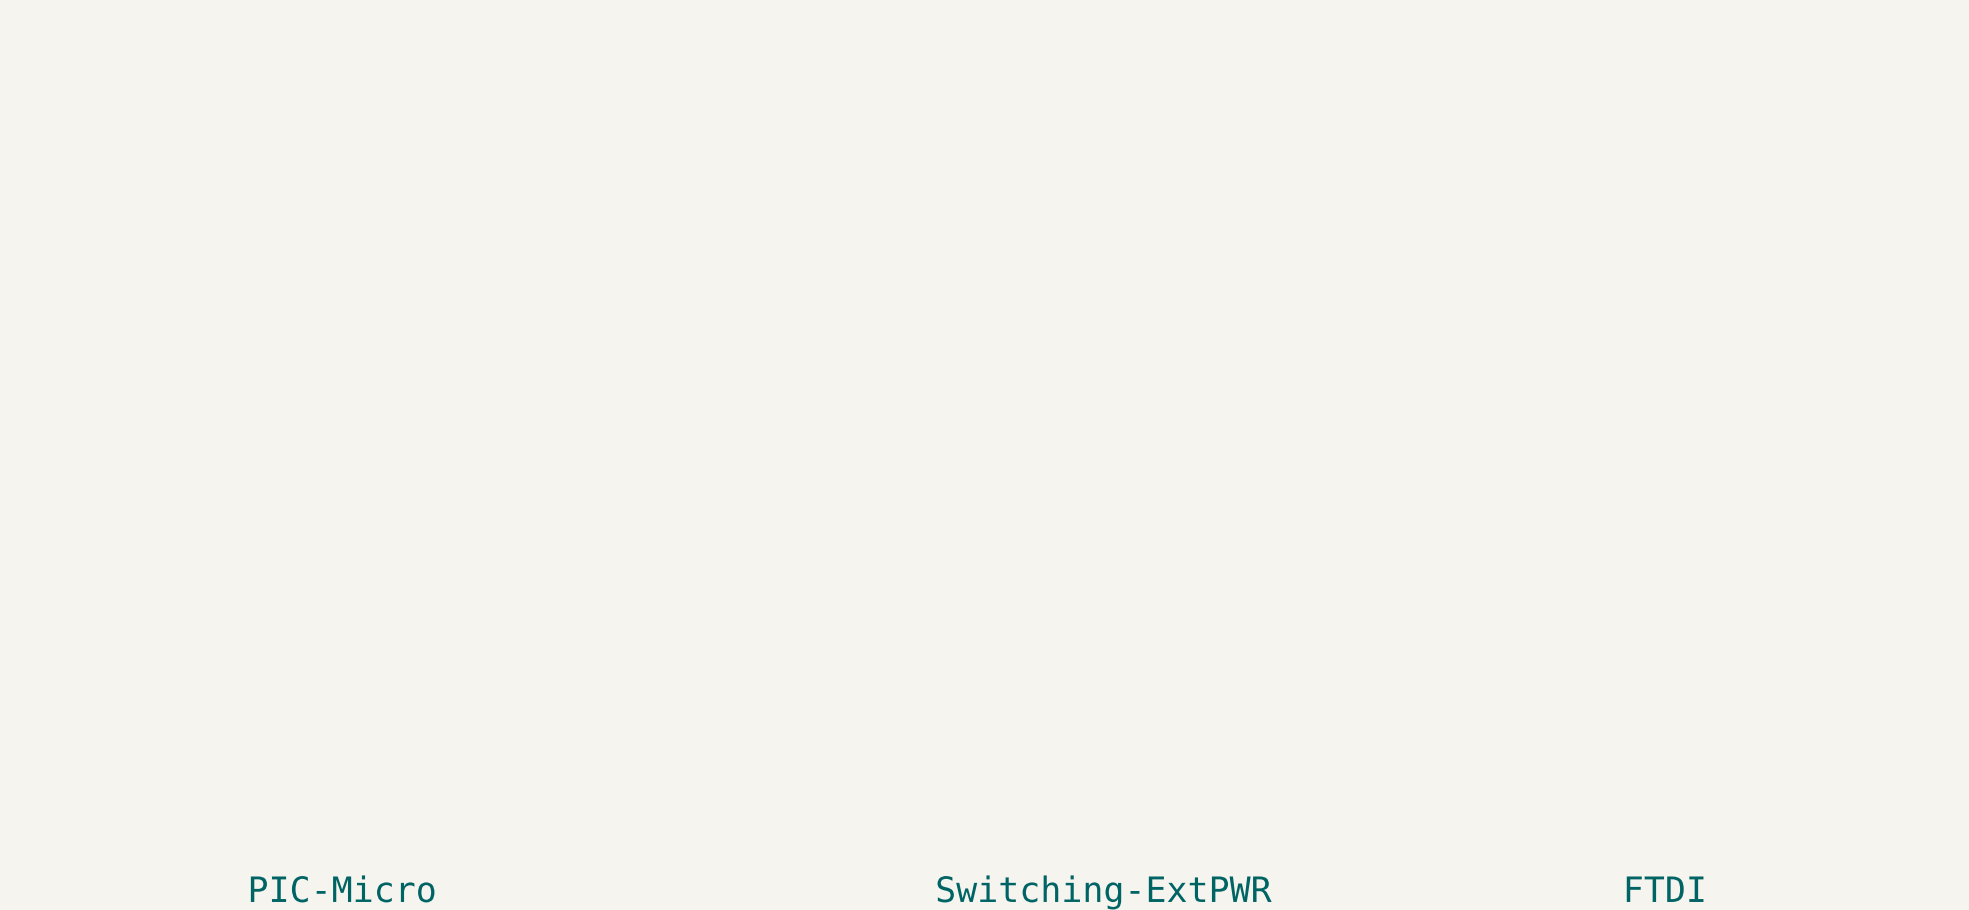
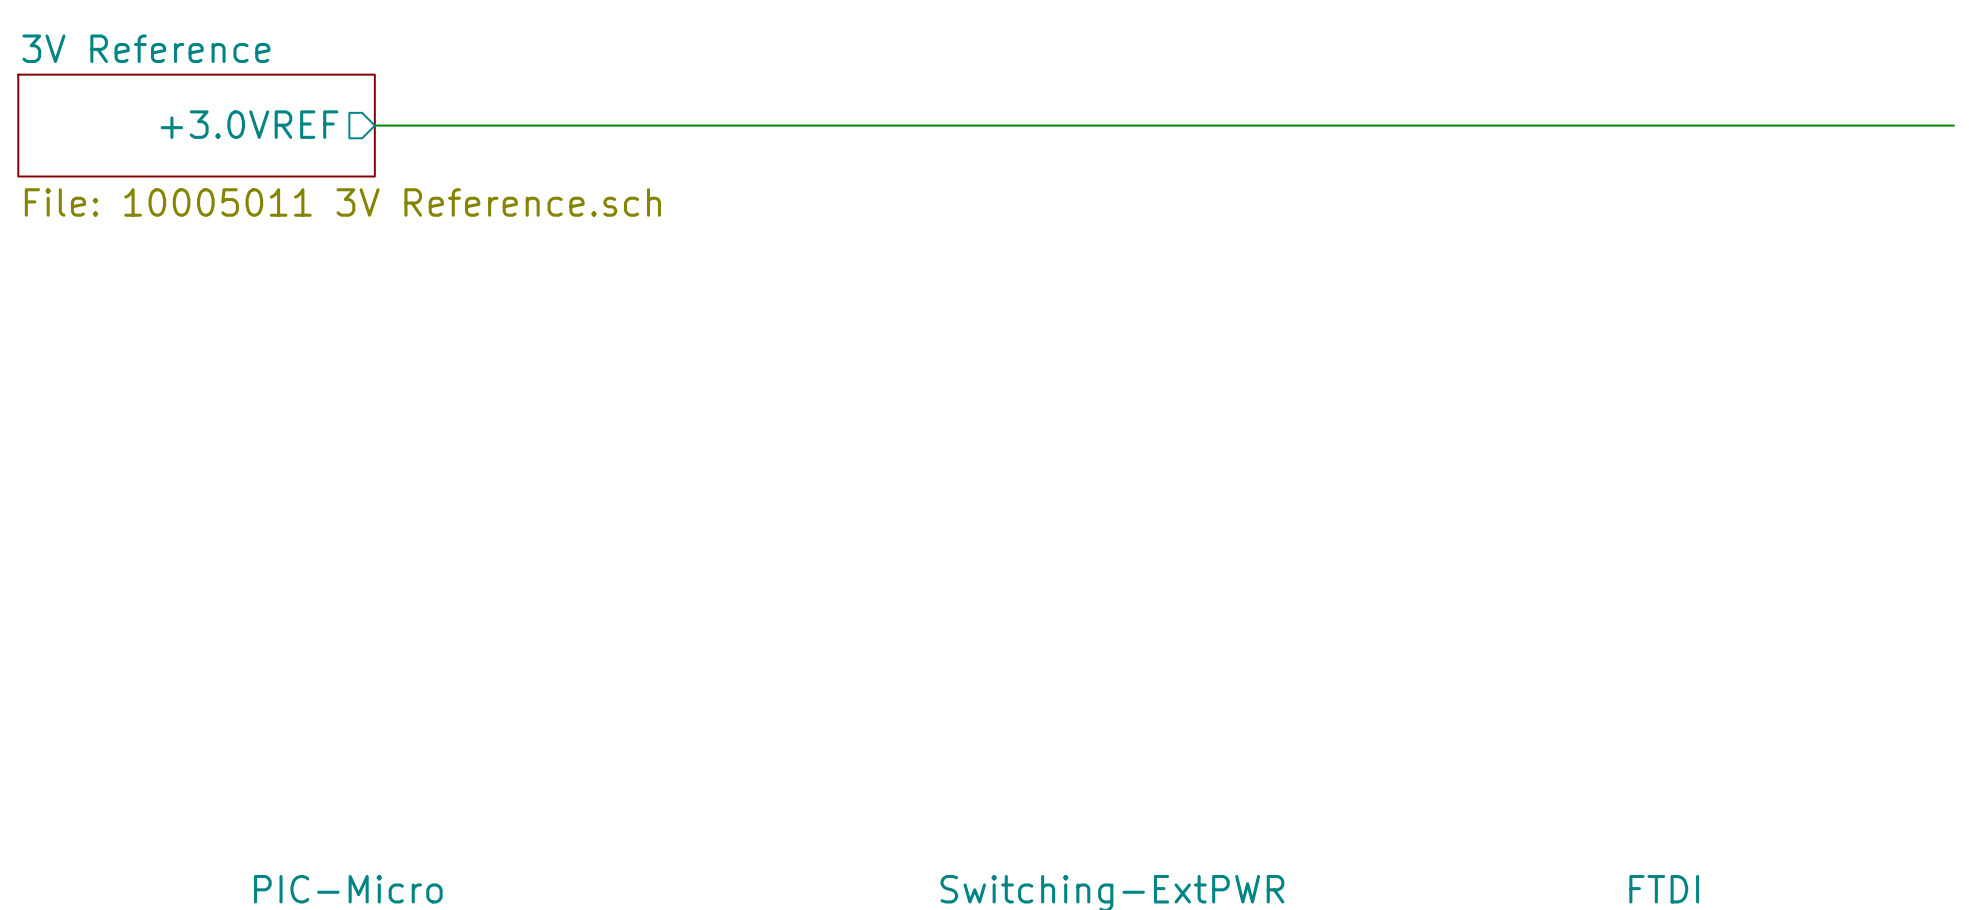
sheet pin: none -> +3.0VREF (249, 124)
sheet 3V Reference: none -> File: 10005011 3V Reference.sch (196, 125)
wire: none -> (374, 125) (1953, 125)

